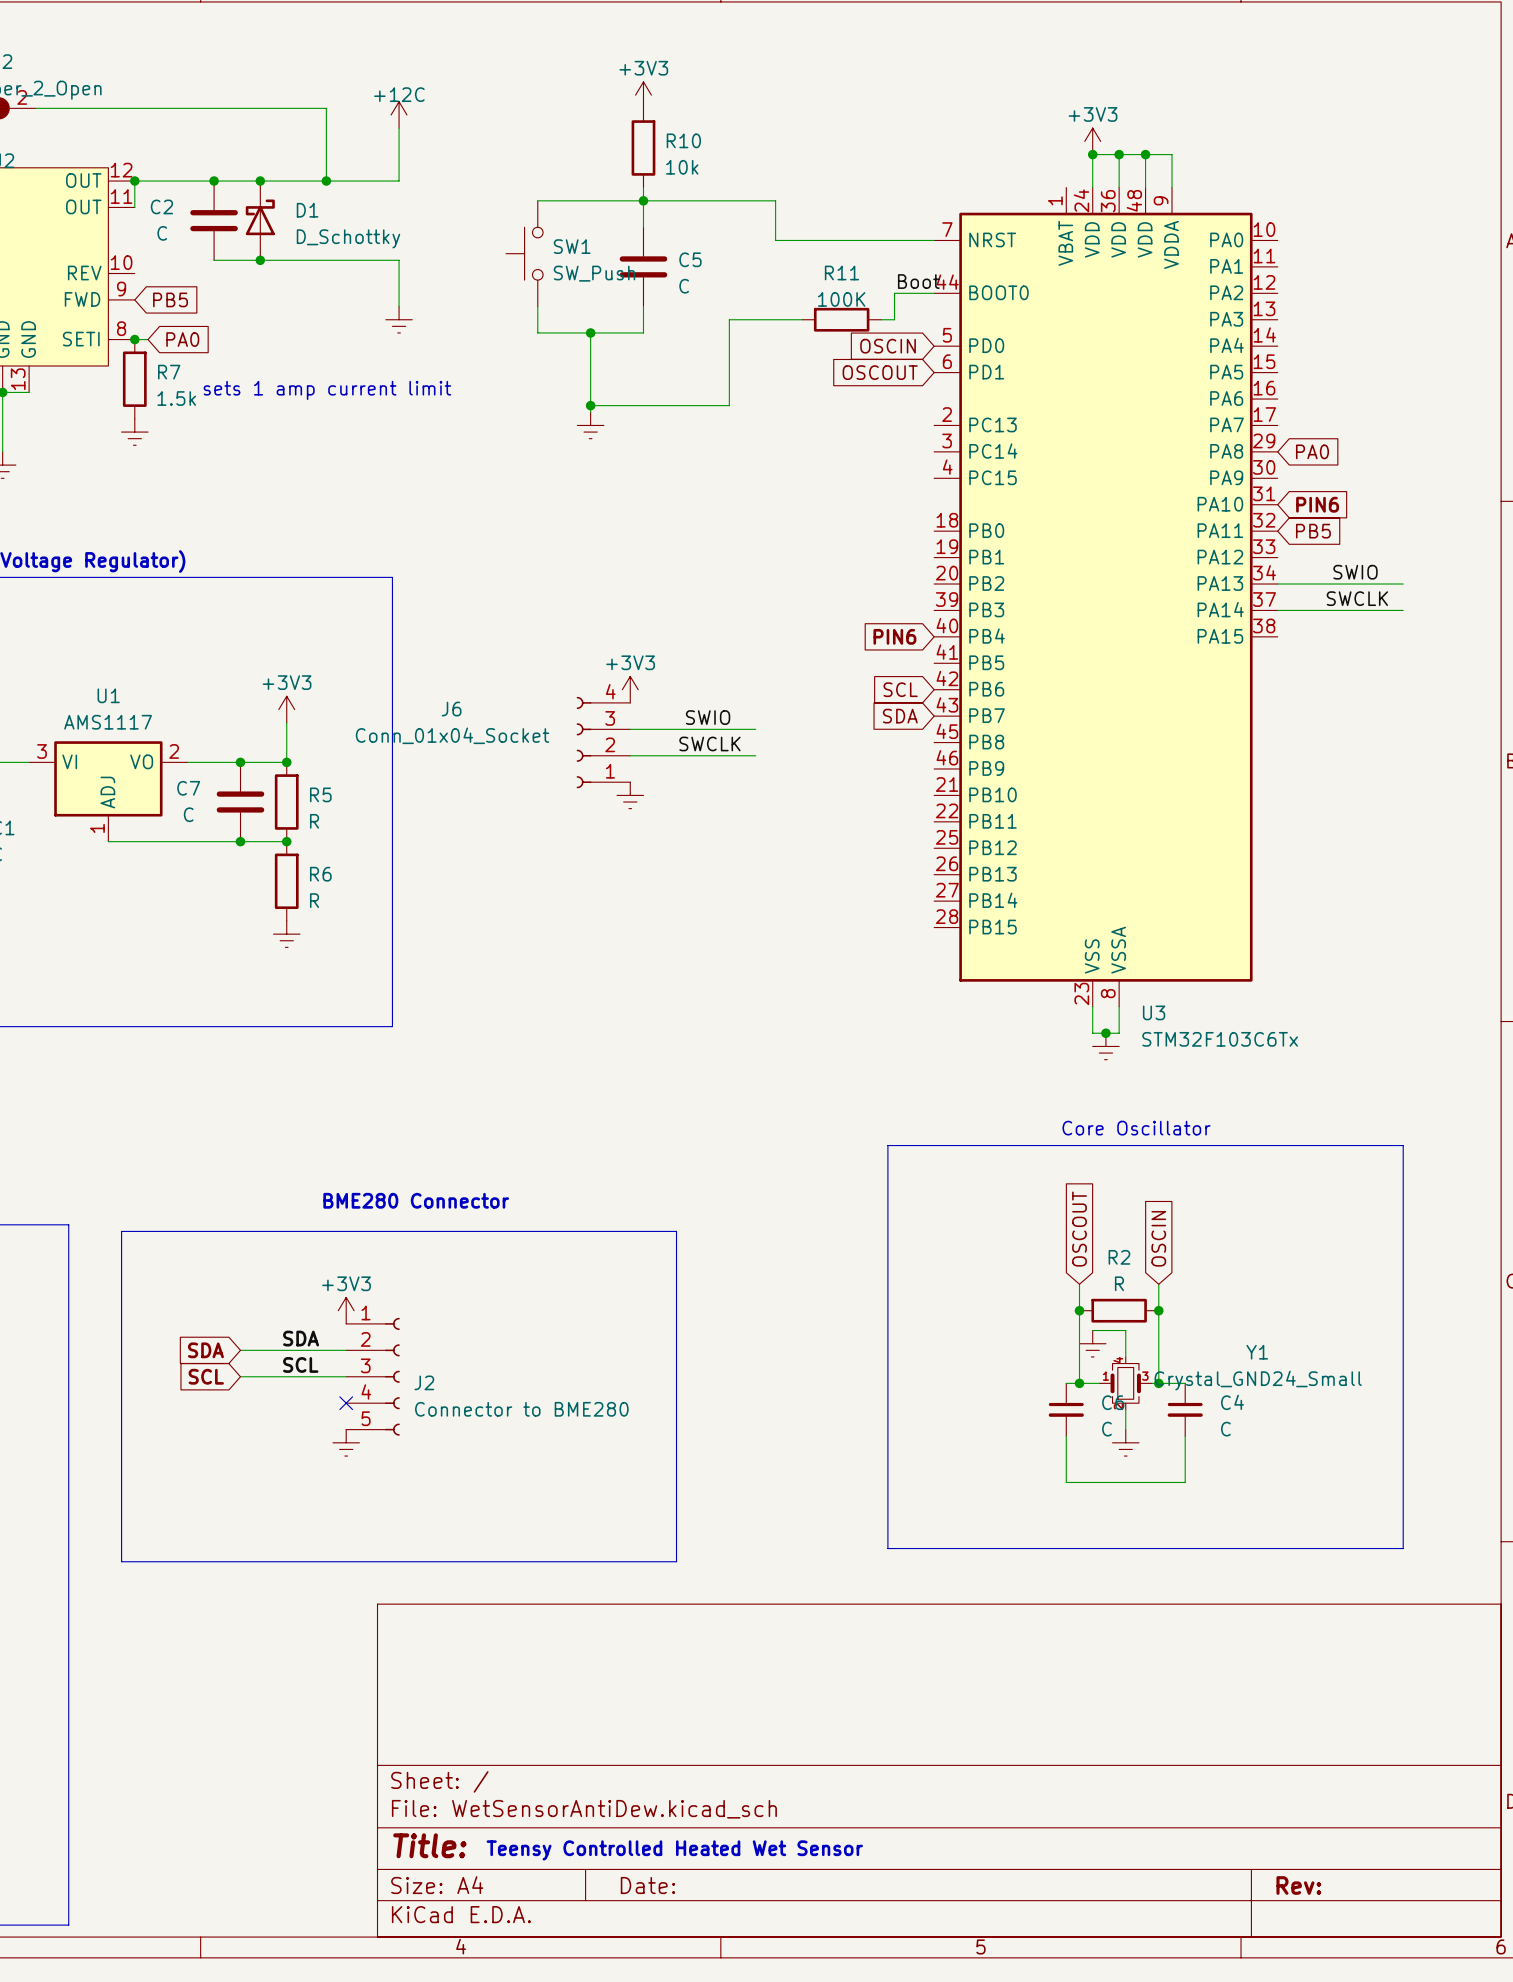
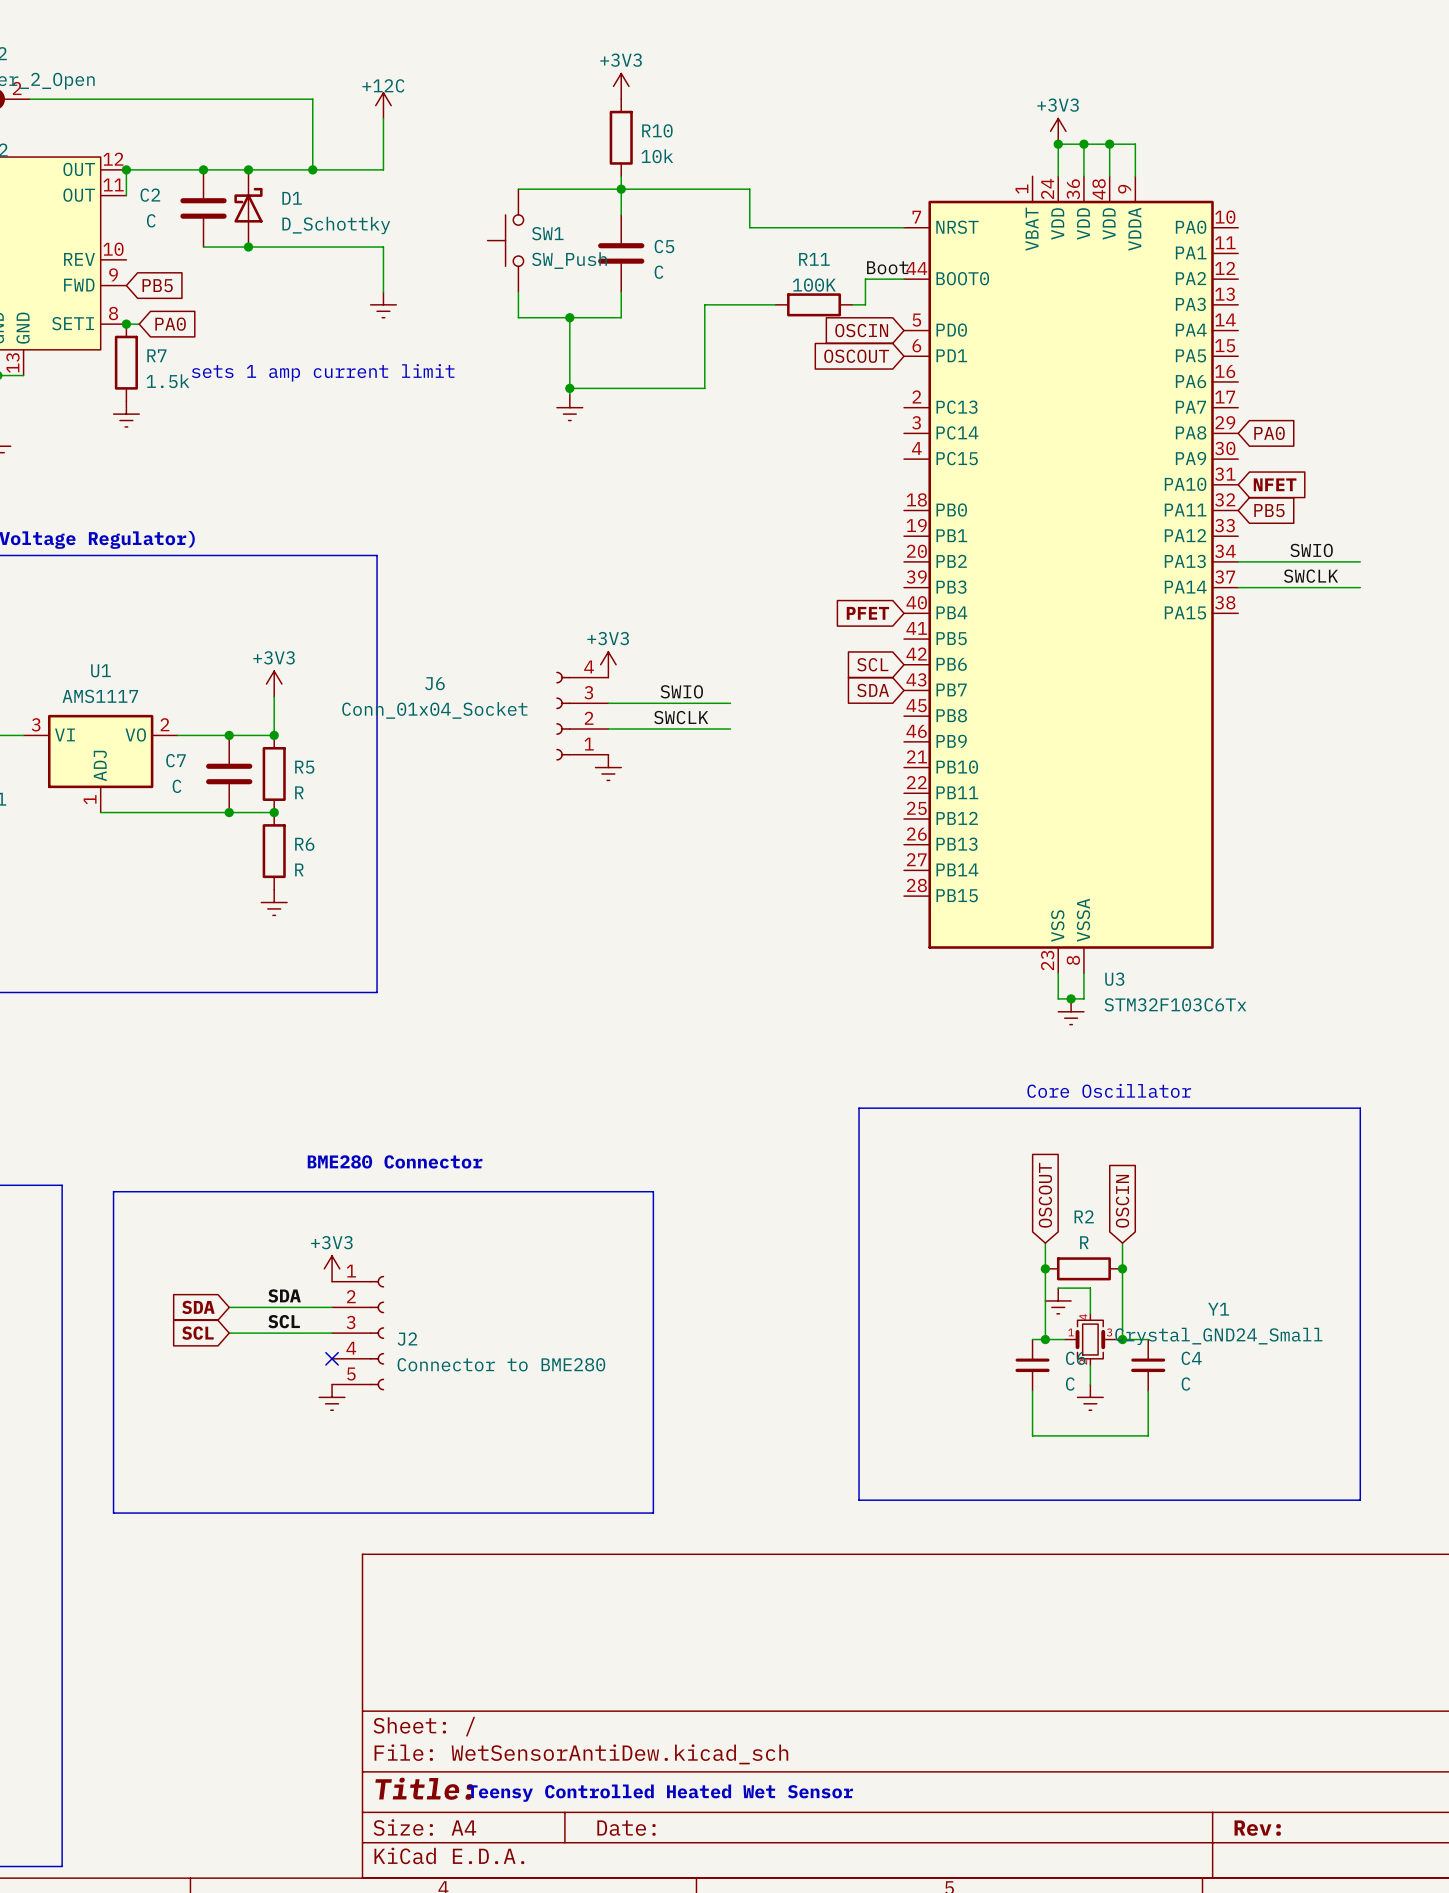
global label: PIN6 (1317, 504) -> NFET (1275, 484)
global label: PIN6 (894, 636) -> PFET (867, 613)

